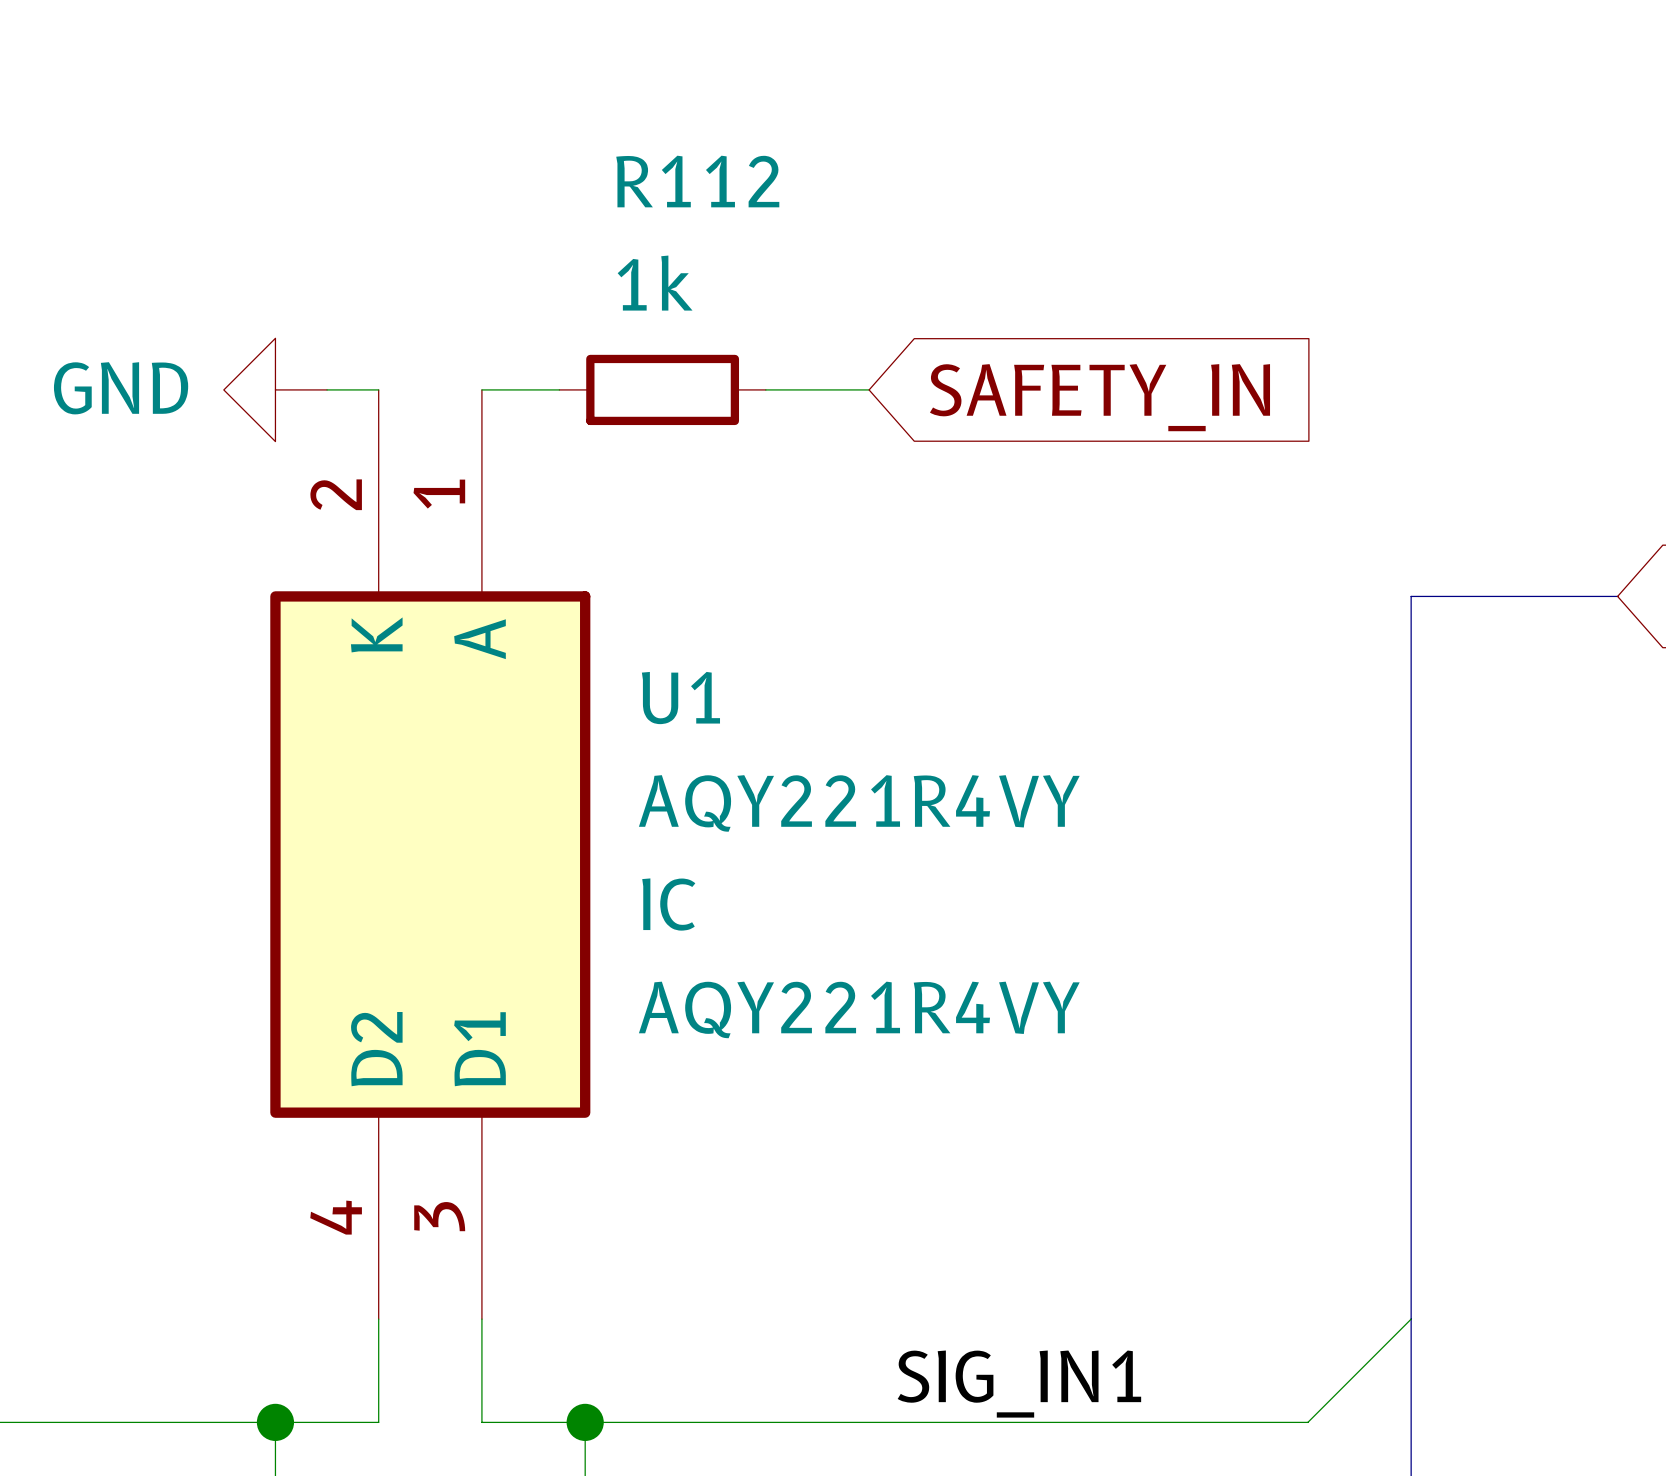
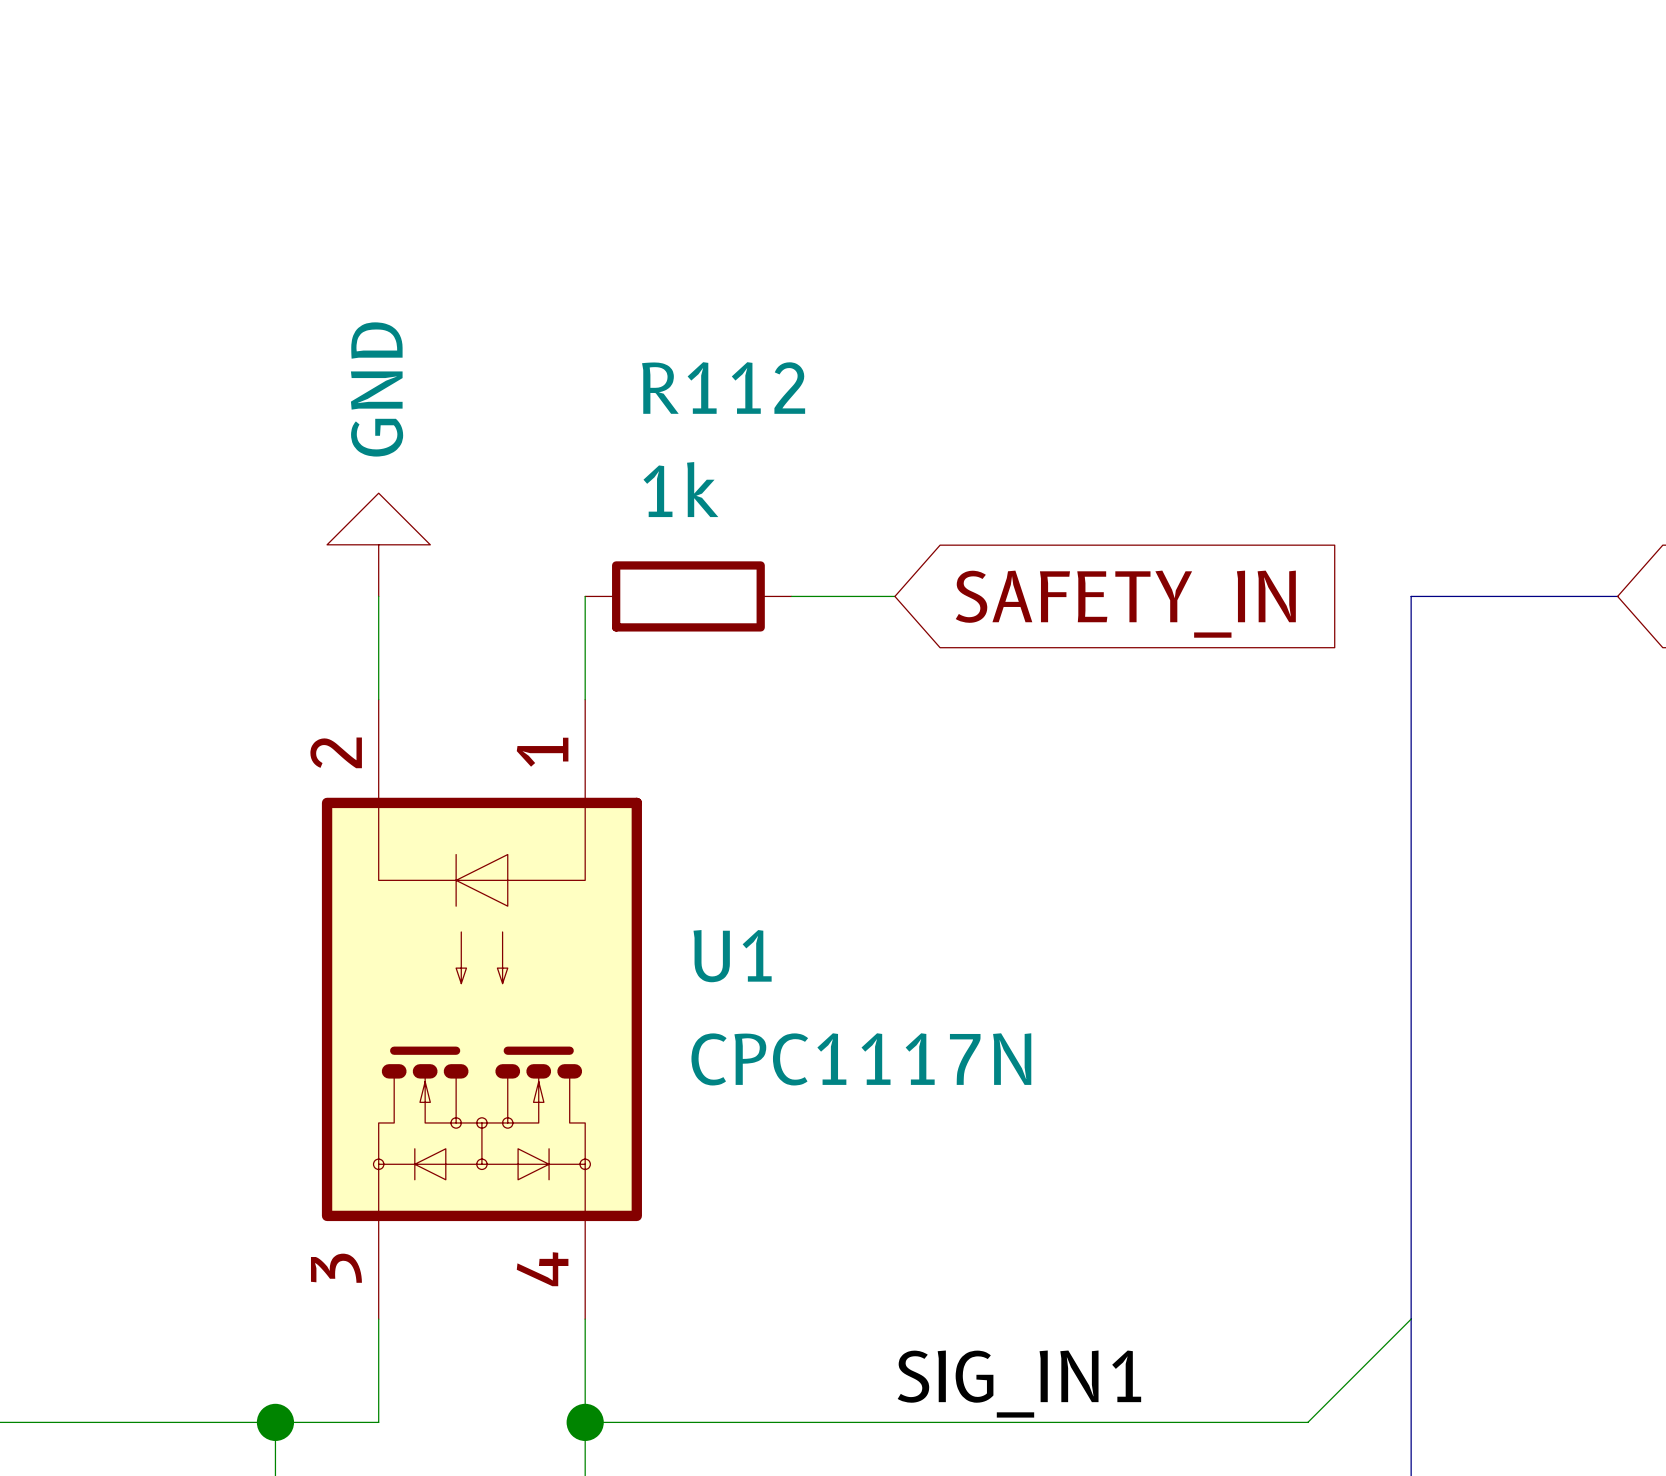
U1 symbol: [270, 389, 591, 1320] -> [321, 699, 642, 1320]
power symbol rotation: 0° (275, 389) -> 90° clockwise (378, 544)
power symbol position: GND (275, 389) -> GND (378, 544)
wire: (327, 389) (378, 389) -> none
wire: (481, 389) (559, 389) -> none
R112 position: (662, 389) -> (688, 596)
wire: (765, 389) (869, 389) -> (791, 596) (894, 596)
global label position: SAFETY_IN (1100, 397) -> SAFETY_IN (1125, 604)
U1 name position: U1 (680, 698) -> U1 (732, 956)
U1 value: AQY221R4VY (859, 803) -> CPC1117N (861, 1059)
U1 text: IC (668, 904) -> none
U1 text: AQY221R4VY (859, 1009) -> none
wire: (481, 1319) (481, 1422) (585, 1422) -> (585, 1319) (585, 1422)

